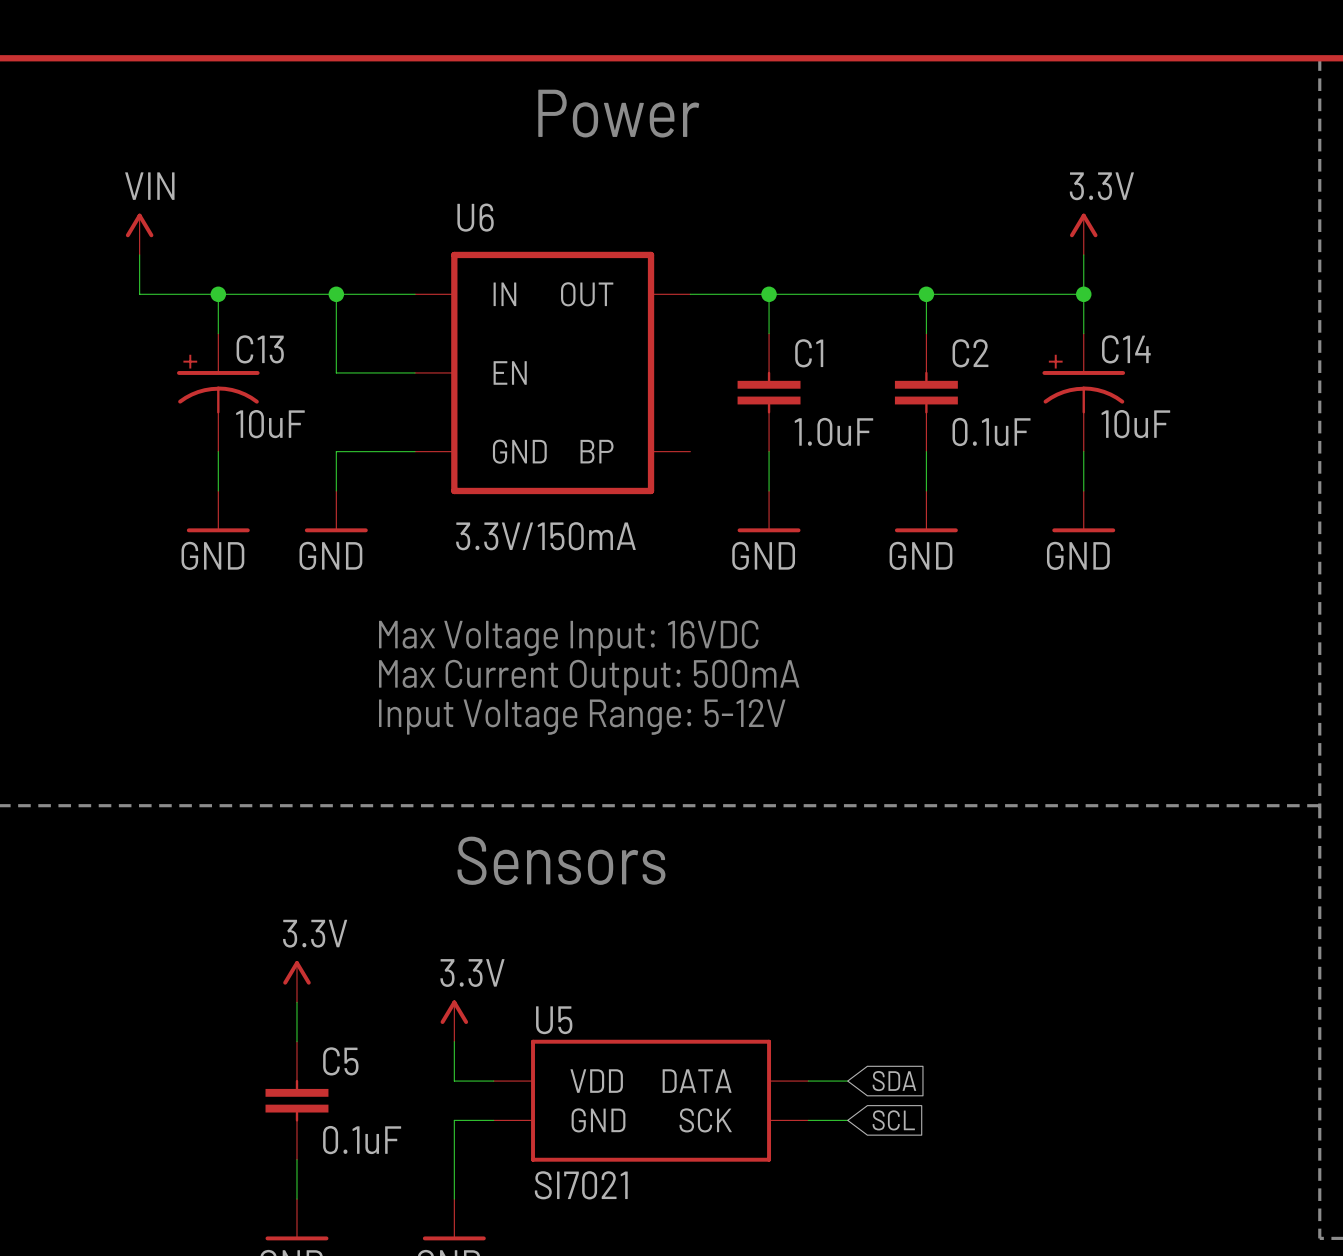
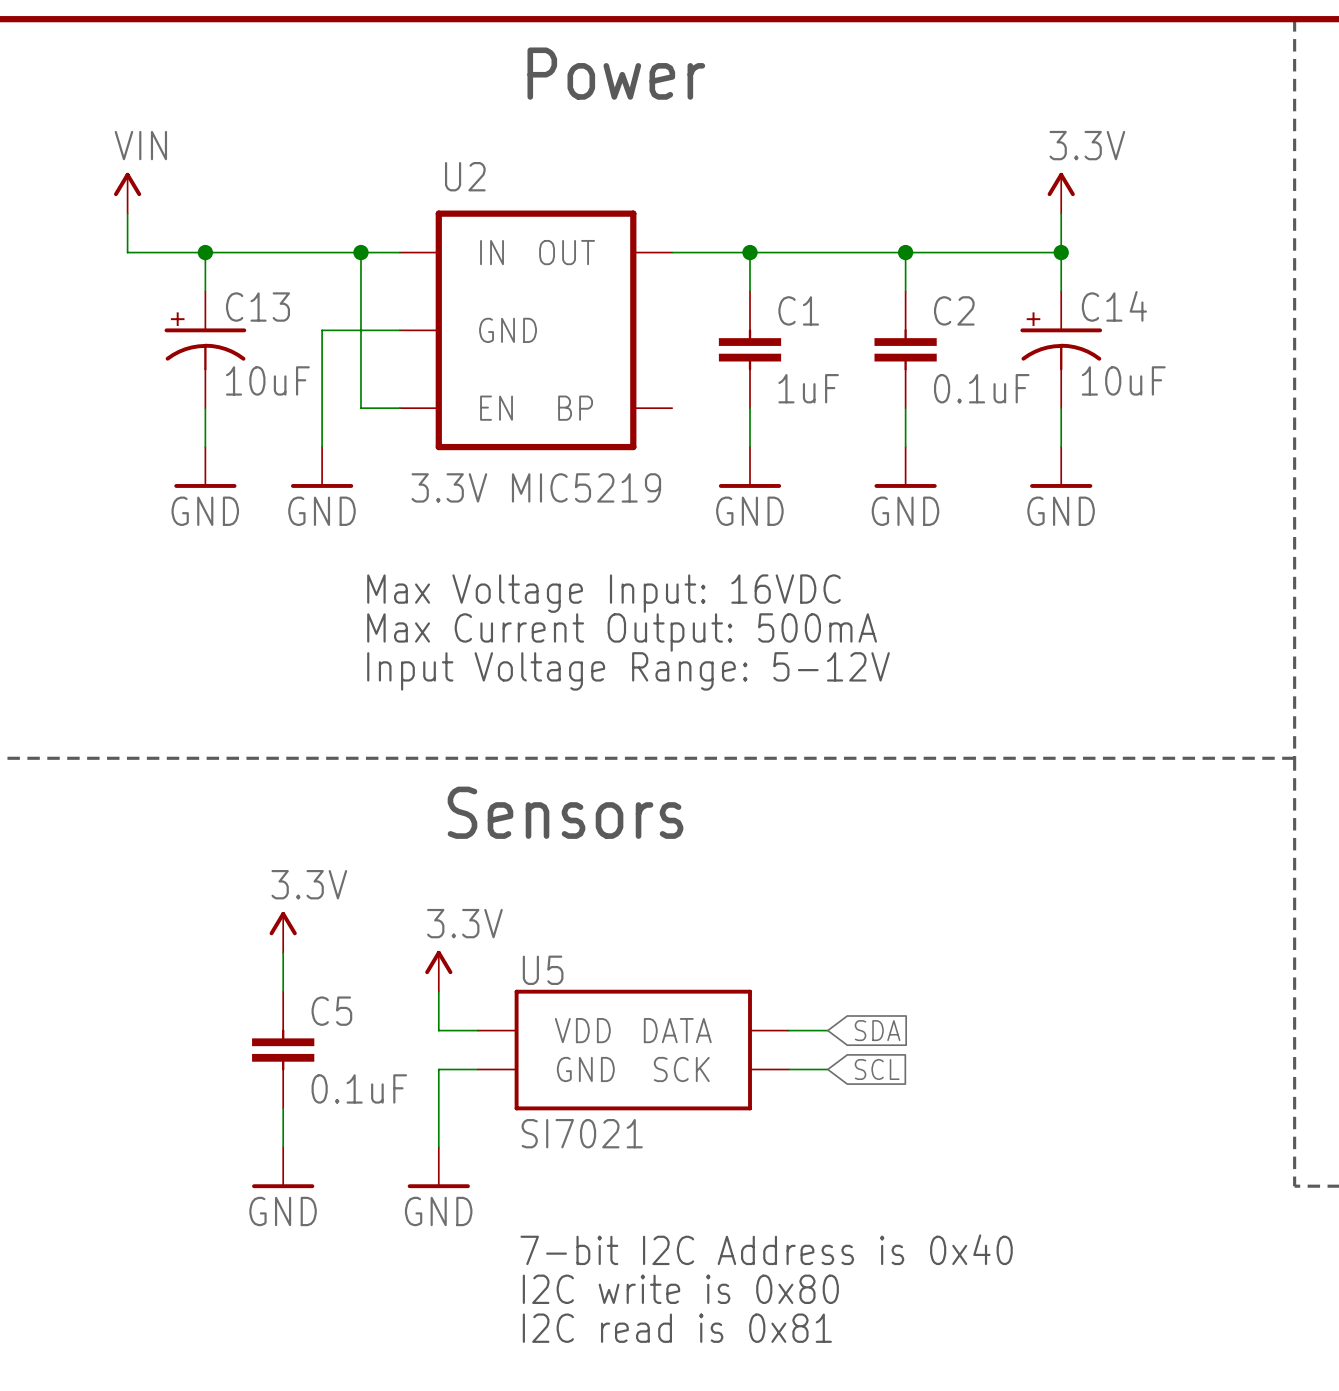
U6 name: U6 (475, 217) -> U2 (465, 176)
wire: (336, 294) (336, 372) -> none
junction position: (336, 294) -> (360, 252)
wire: none -> (360, 252) (360, 408)
U6 pin name: EN (510, 372) -> GND (508, 330)
C1 value: 1.0uF (833, 431) -> 1uF (808, 388)
wire: (336, 451) (375, 451) -> (322, 408) (322, 330)
U6 pin name: GND (519, 451) -> EN (496, 408)
U6 value: 3.3V/150mA (545, 536) -> 3.3V MIC5219 (536, 487)

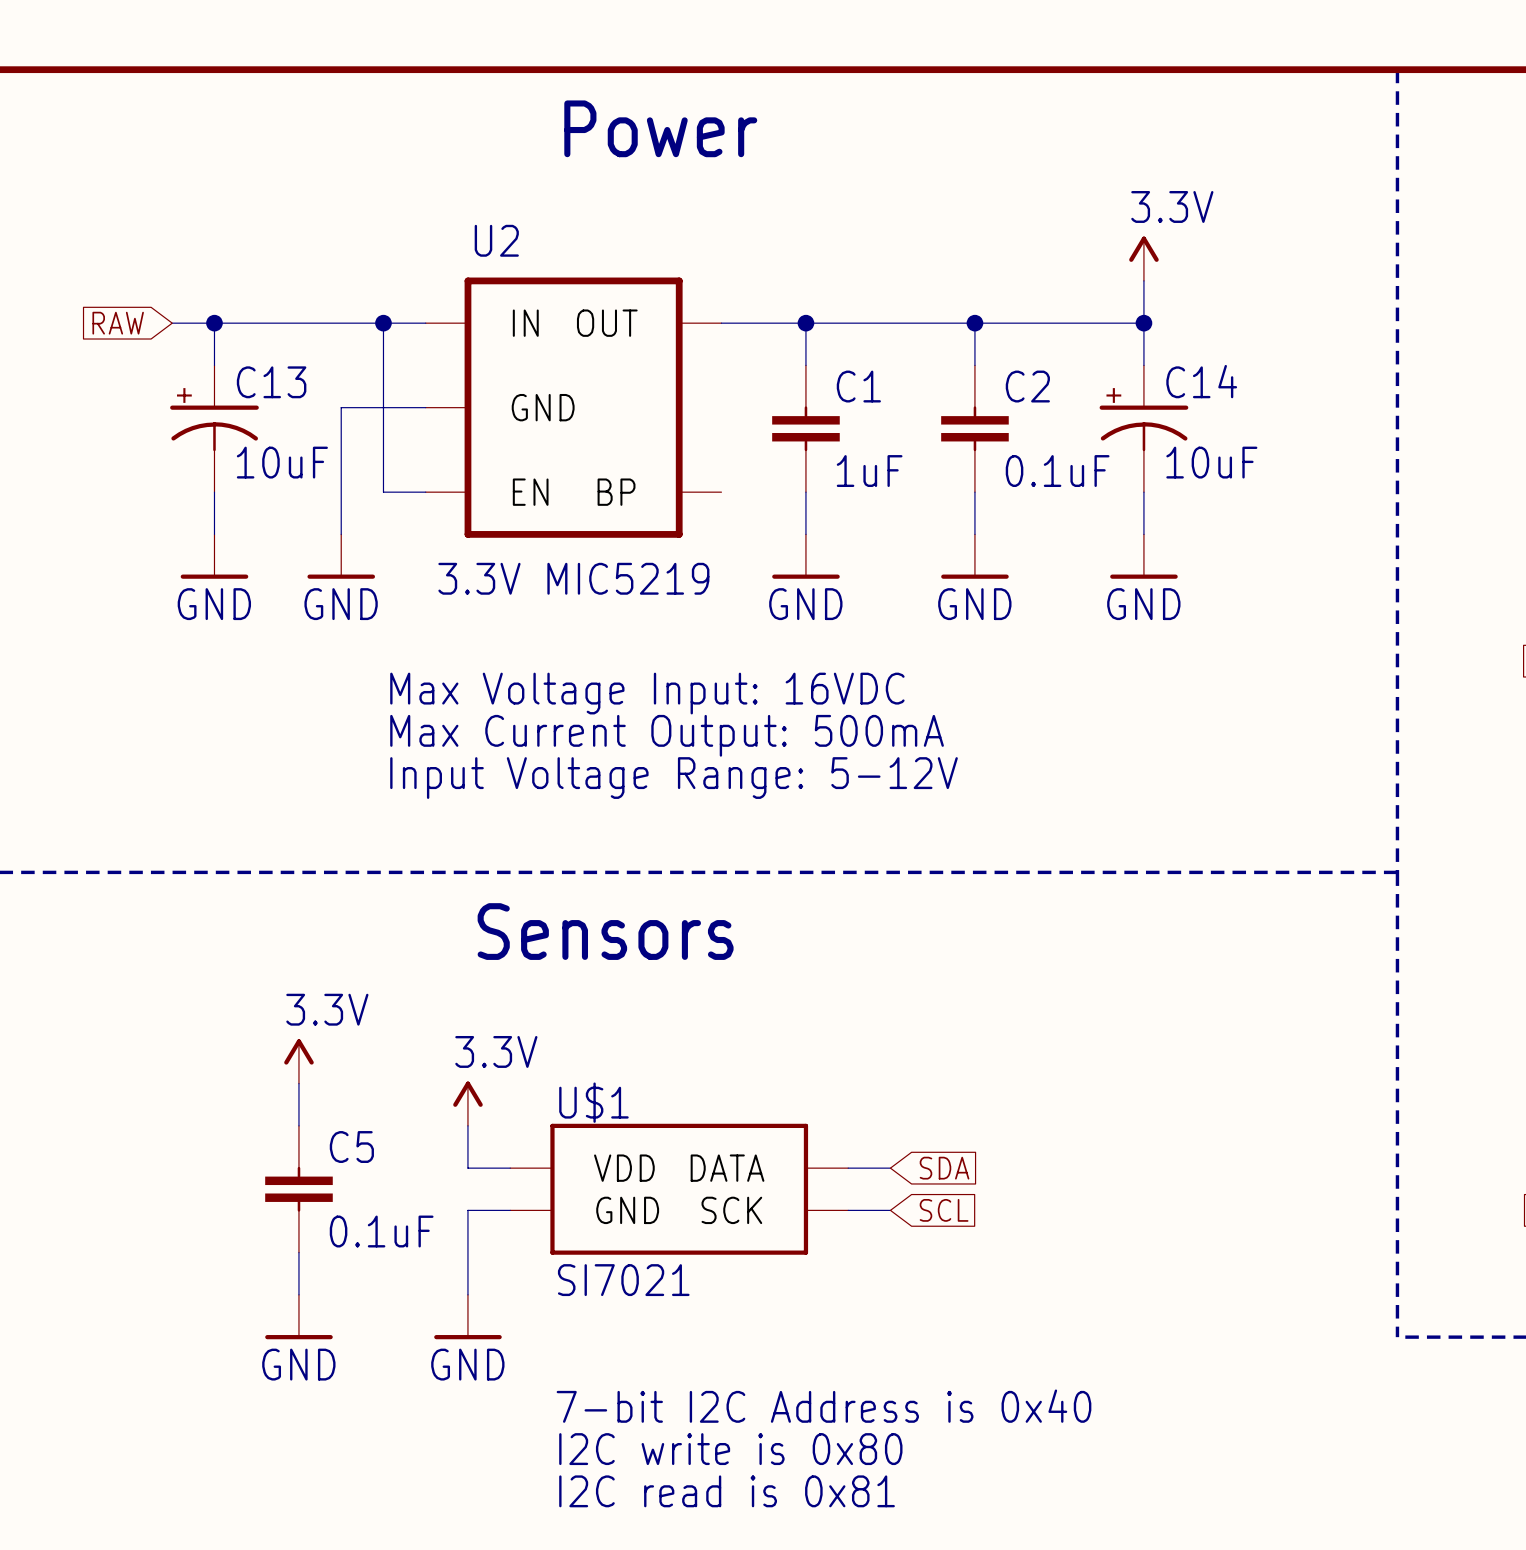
power symbol: VIN (127, 193) -> none
wire: (127, 213) (127, 252) (166, 252) -> none
global label: none -> RAW (118, 323)
U5 name: U5 (543, 970) -> U$1 (593, 1102)

